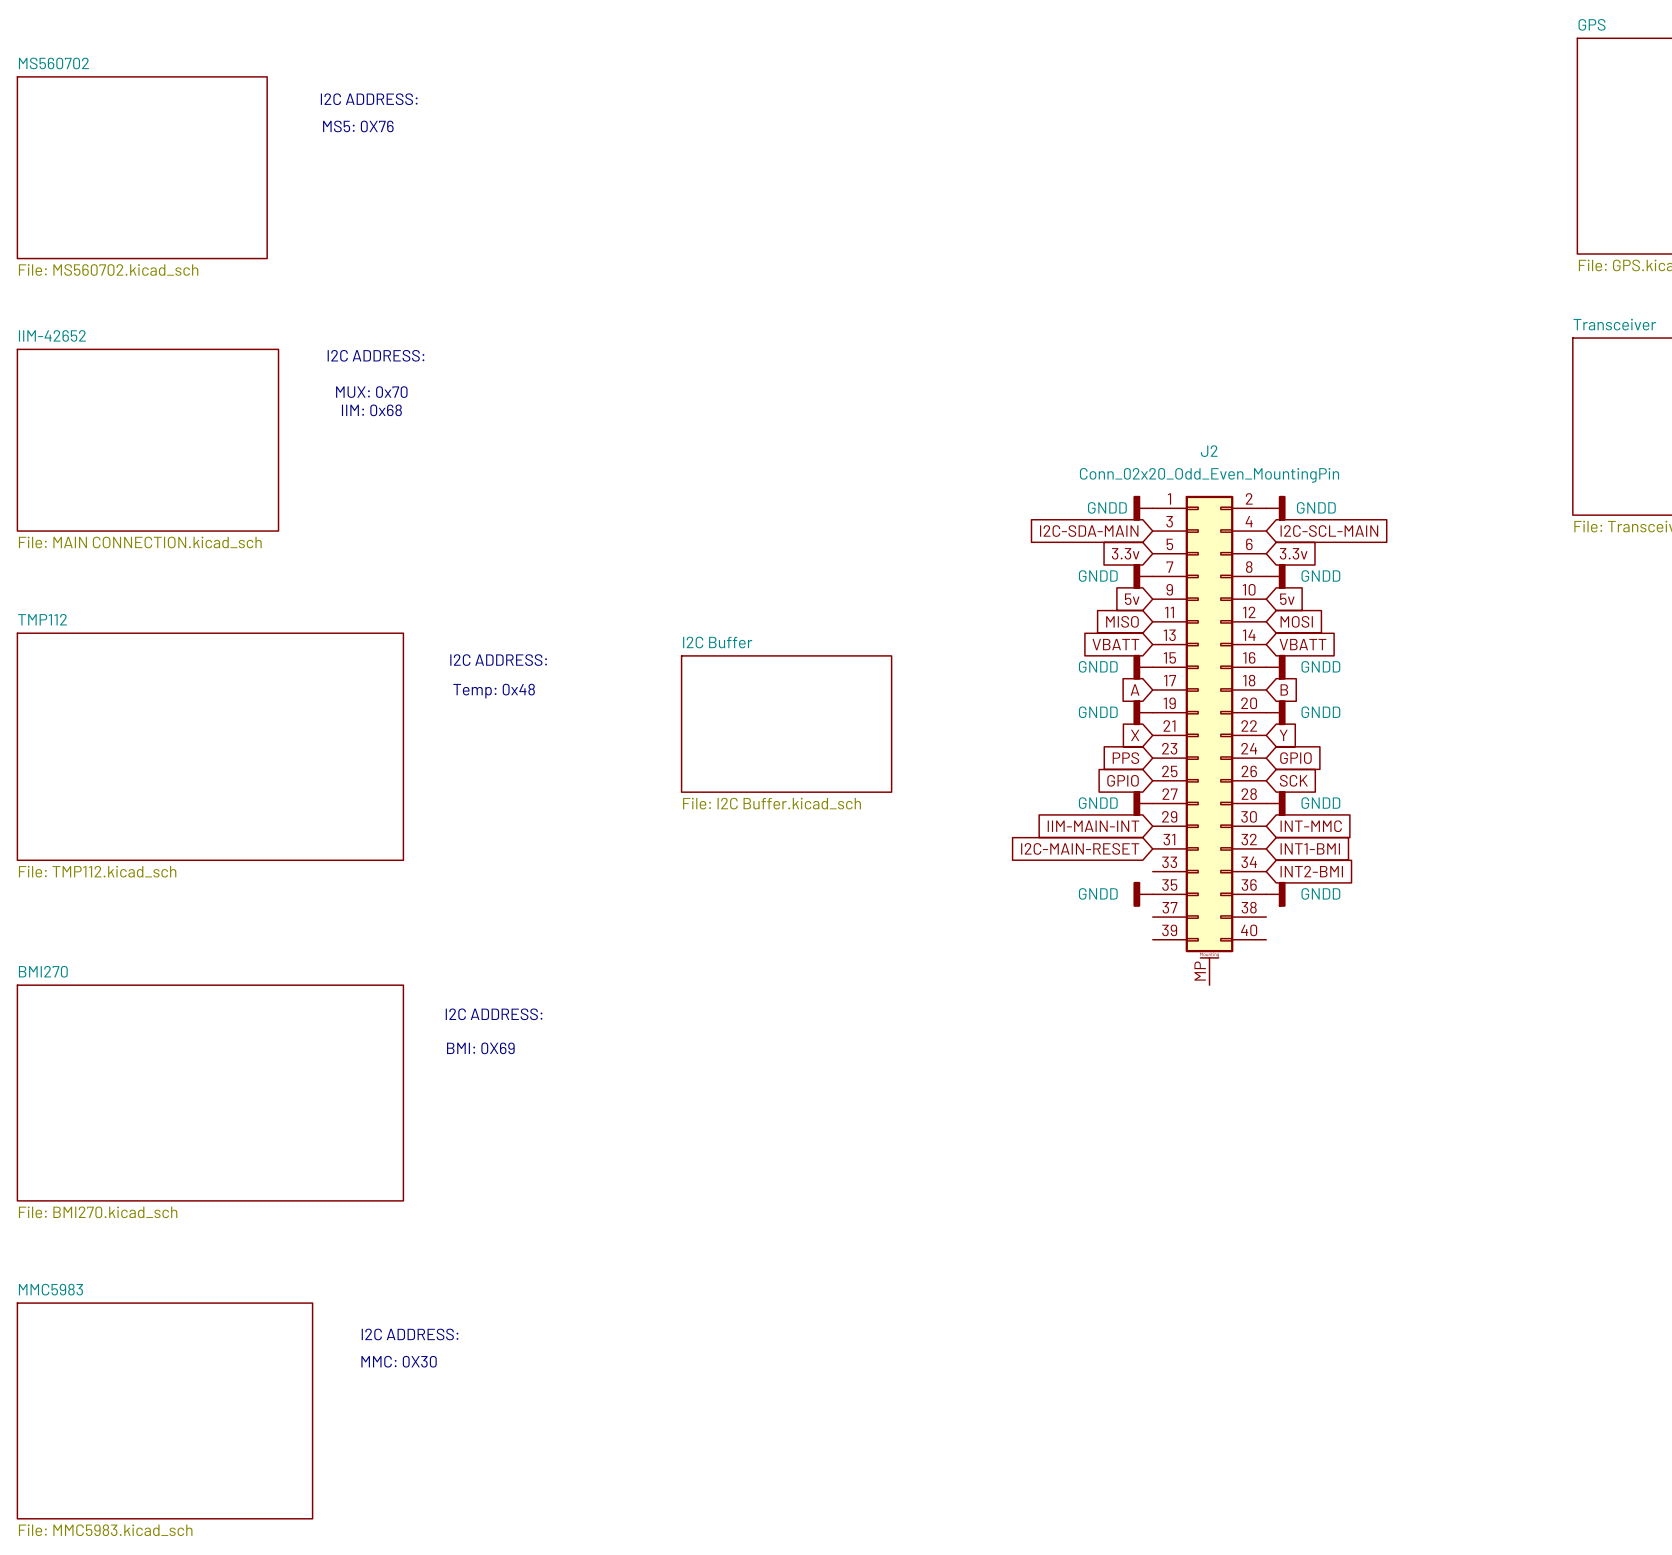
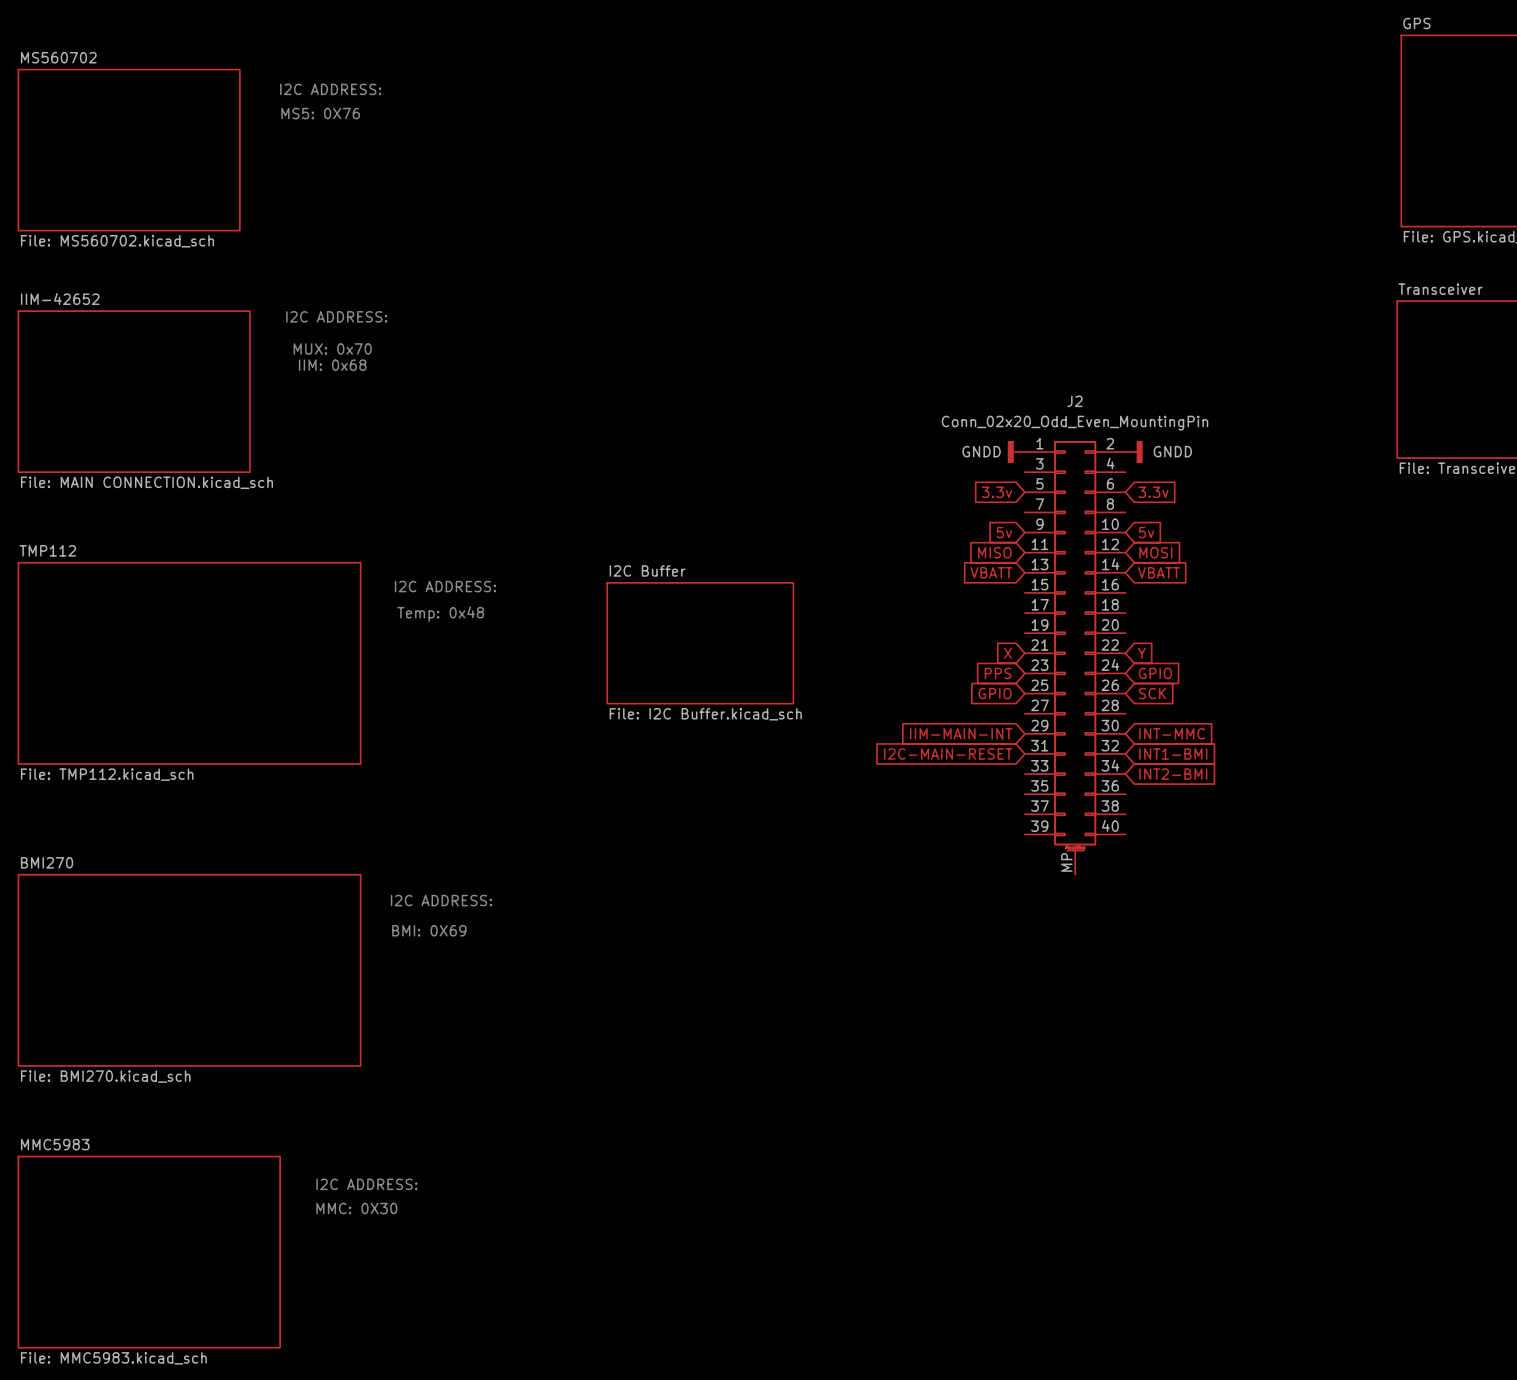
global label: I2C-SDA-MAIN (1089, 531) -> none
global label: I2C-SCL-MAIN (1329, 531) -> none
power symbol: GNDD (1143, 576) -> none
power symbol: GNDD (1275, 576) -> none
power symbol: GNDD (1143, 667) -> none
power symbol: GNDD (1275, 667) -> none
global label: A (1135, 689) -> none
global label: B (1284, 689) -> none
power symbol: GNDD (1143, 712) -> none
power symbol: GNDD (1275, 712) -> none
power symbol: GNDD (1143, 803) -> none
power symbol: GNDD (1275, 803) -> none
power symbol: GNDD (1143, 894) -> none
power symbol: GNDD (1275, 894) -> none

